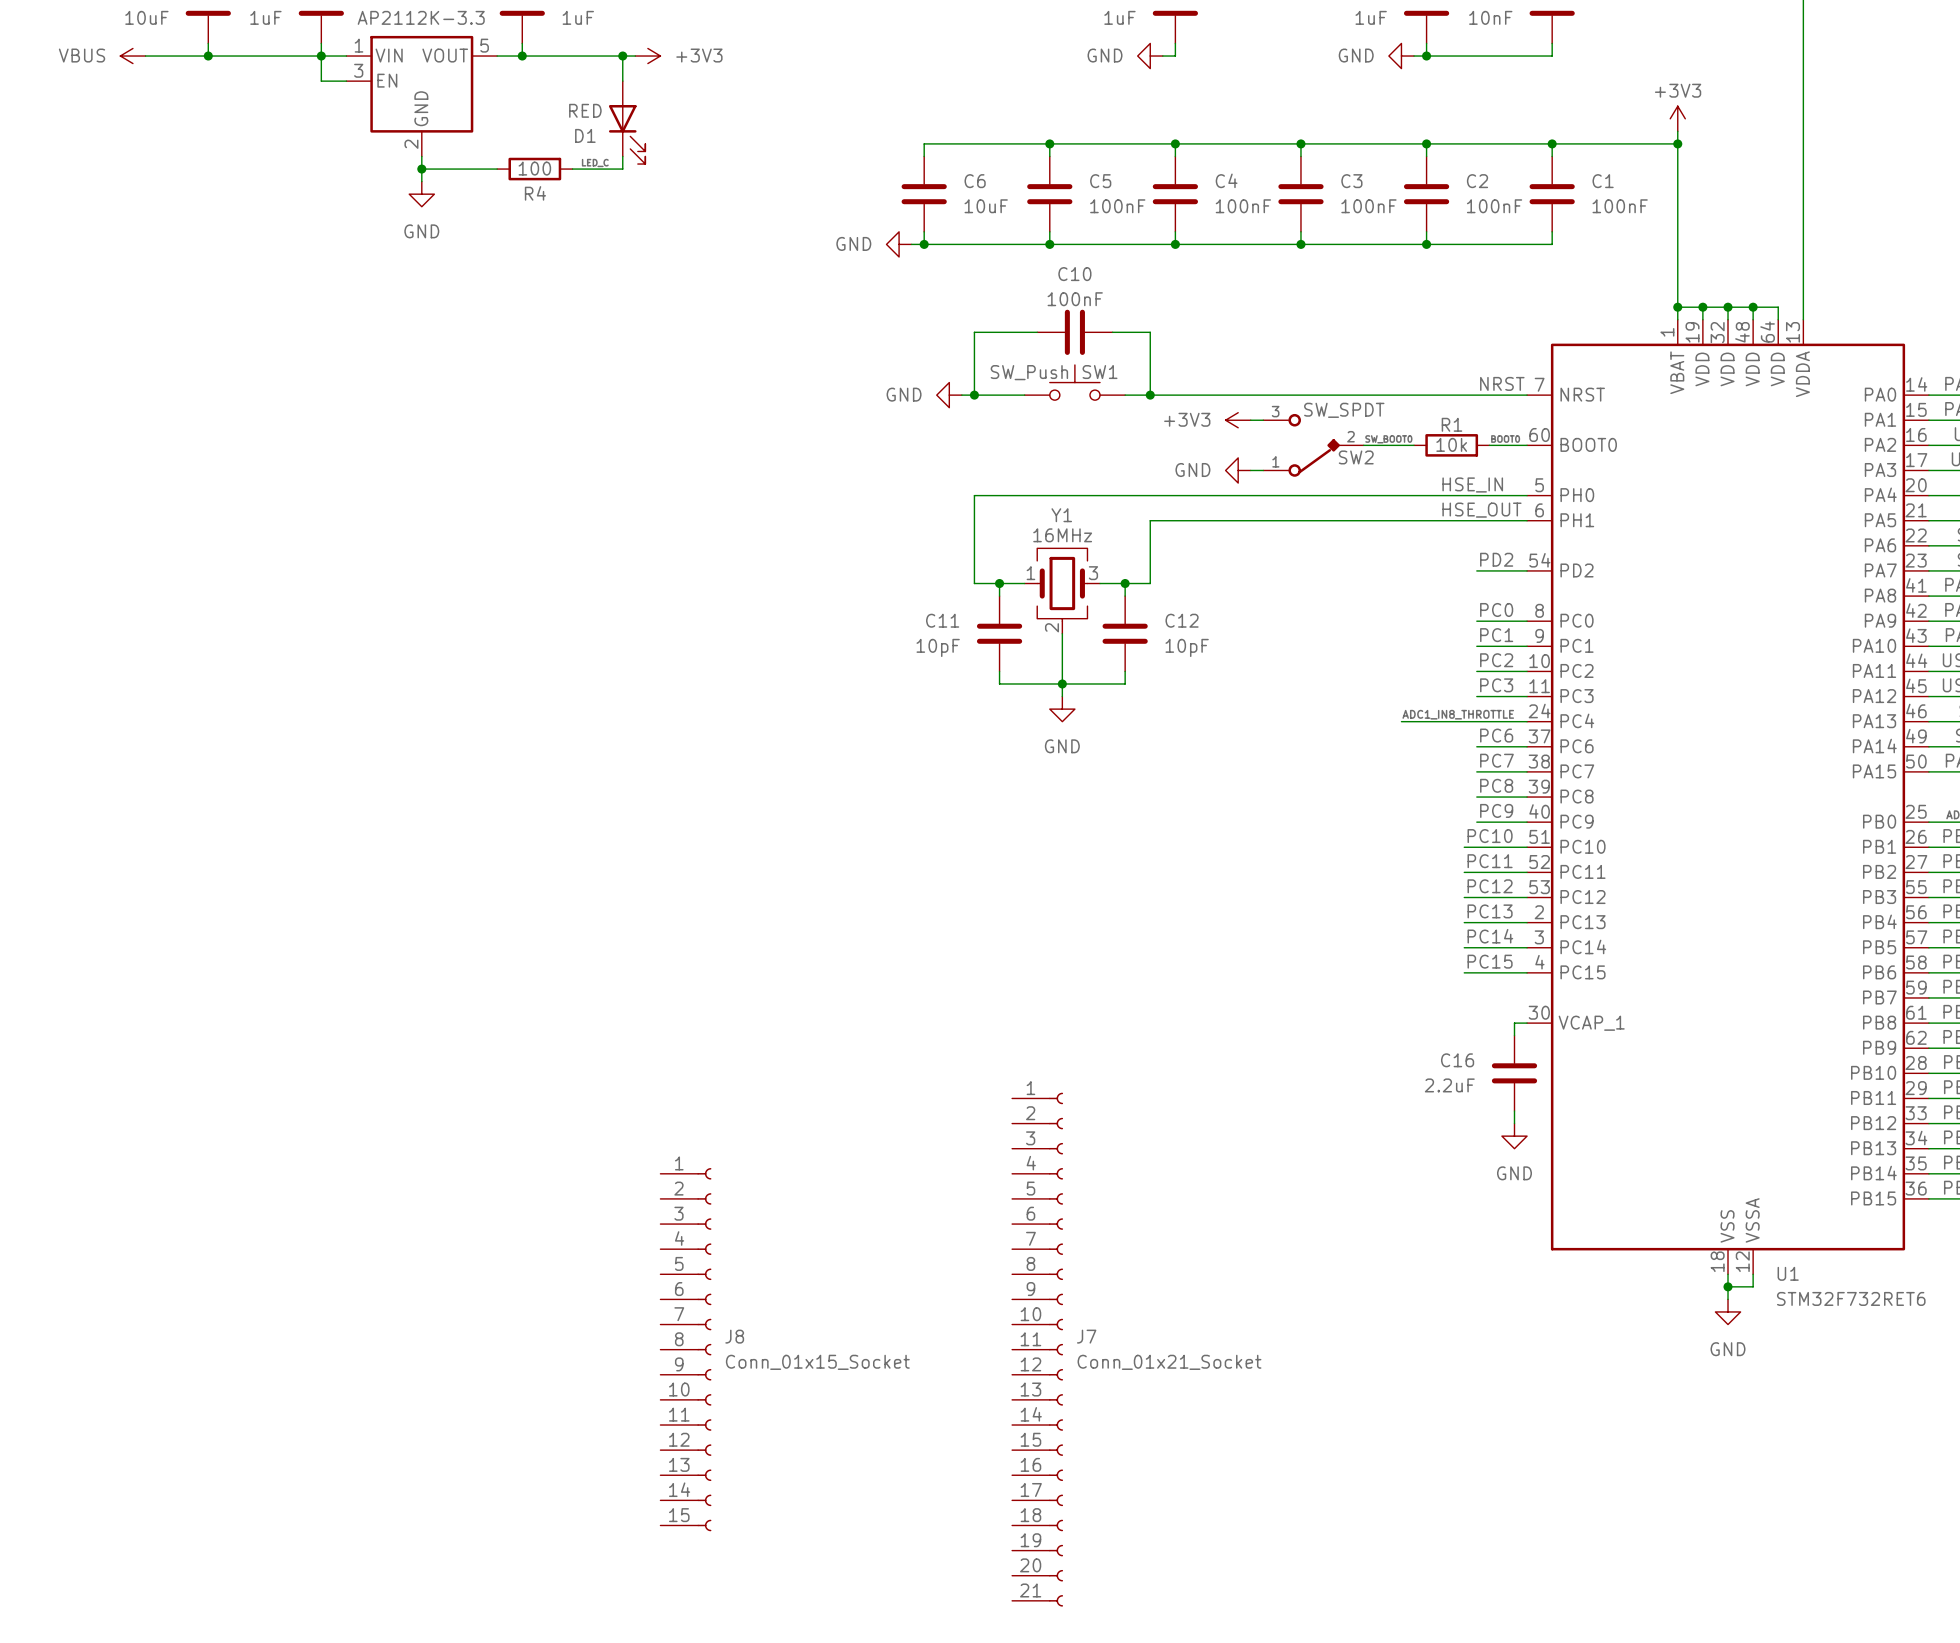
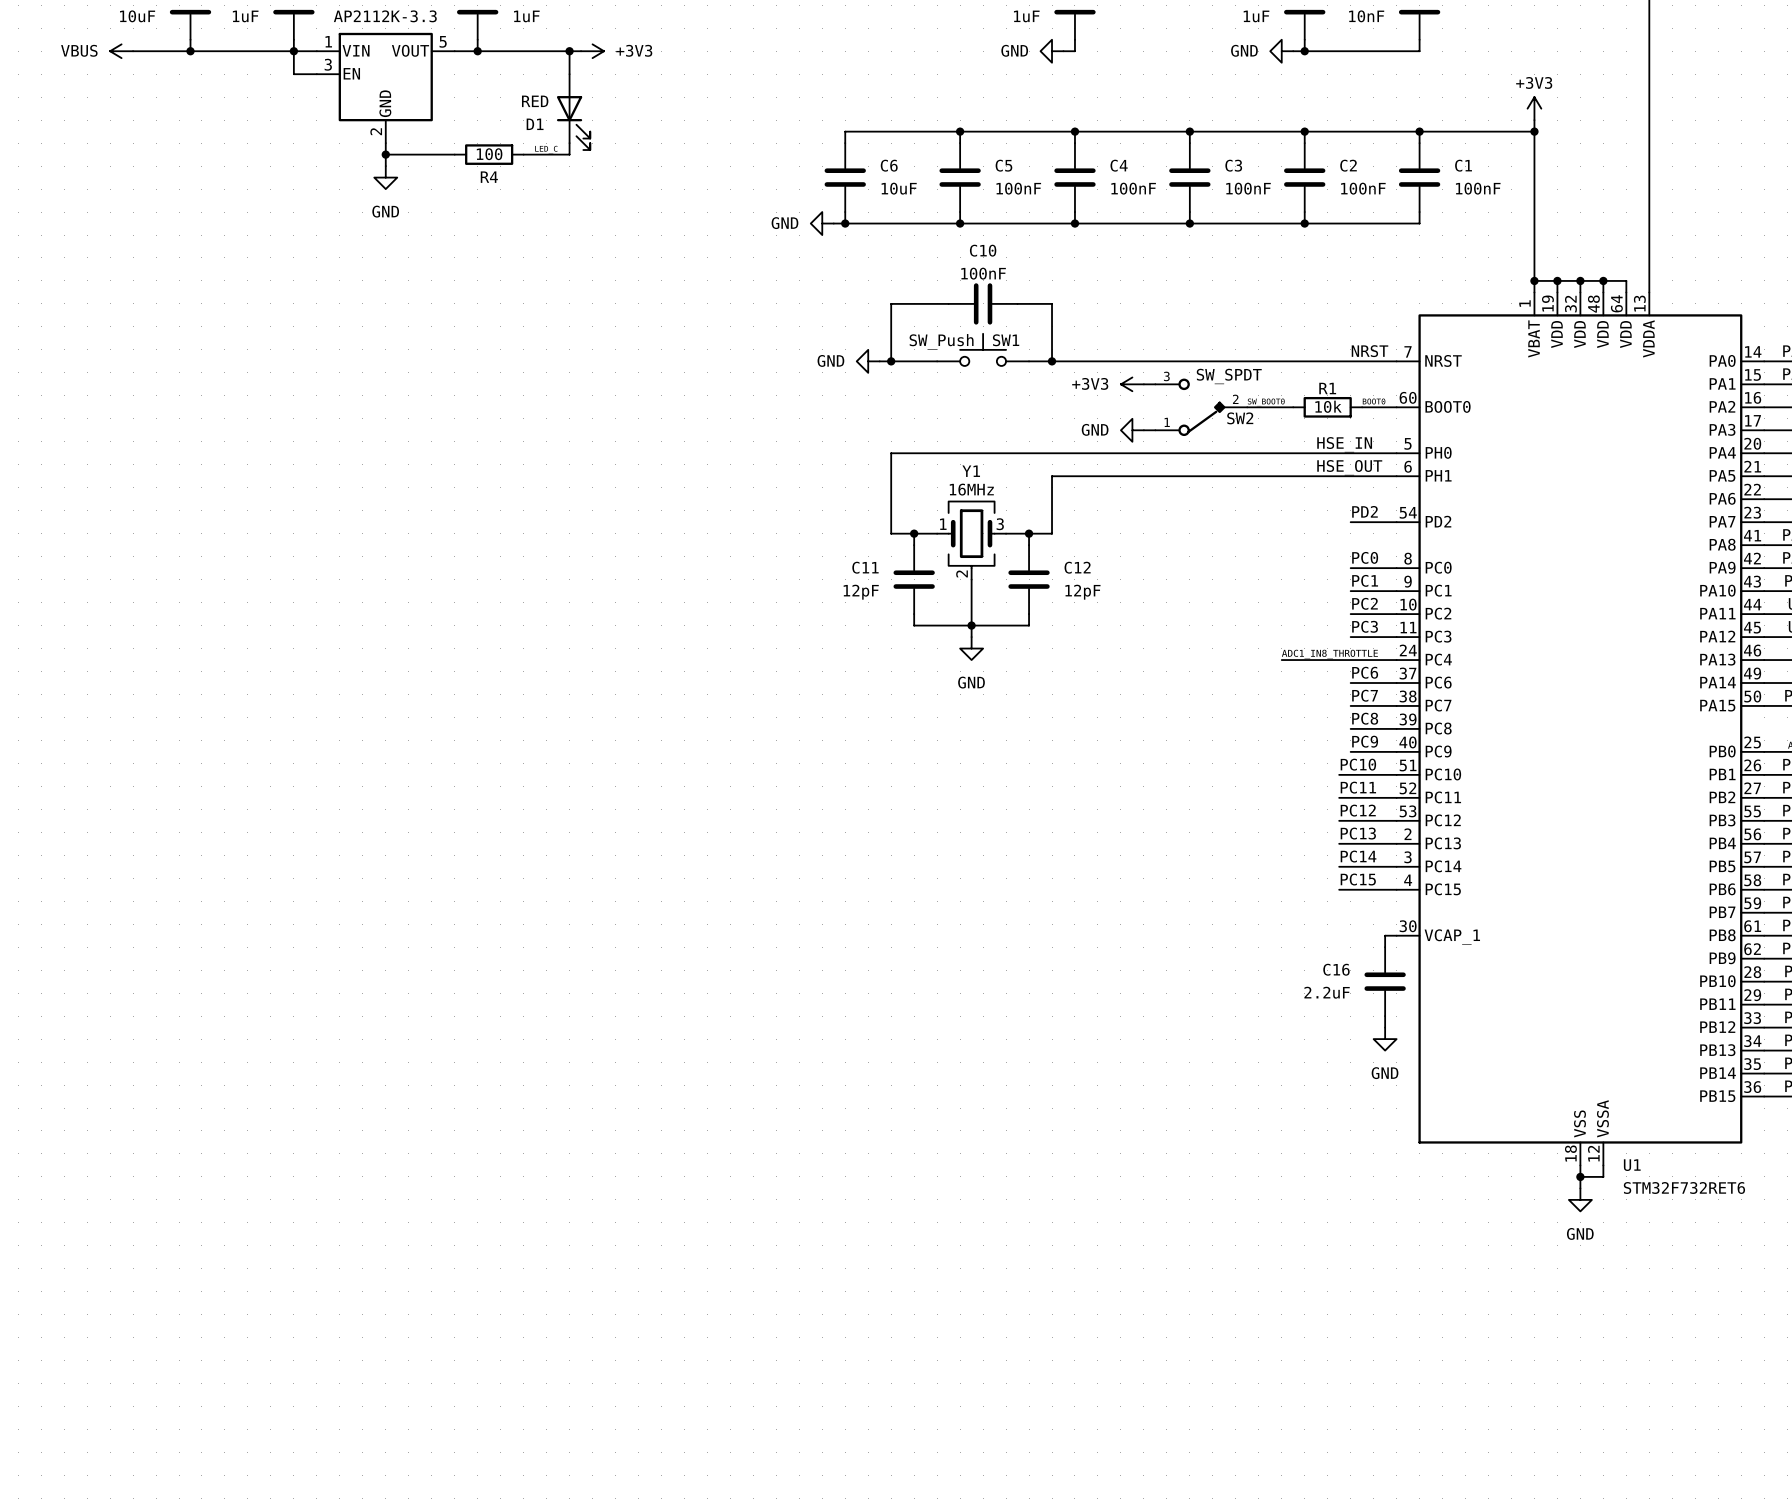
C11 value: 10pF (938, 647) -> 12pF (861, 592)
C12 value: 10pF (1187, 647) -> 12pF (1082, 592)
J8: Conn_01x15_Socket (685, 1349) -> none
J7: Conn_01x21_Socket (1037, 1349) -> none

